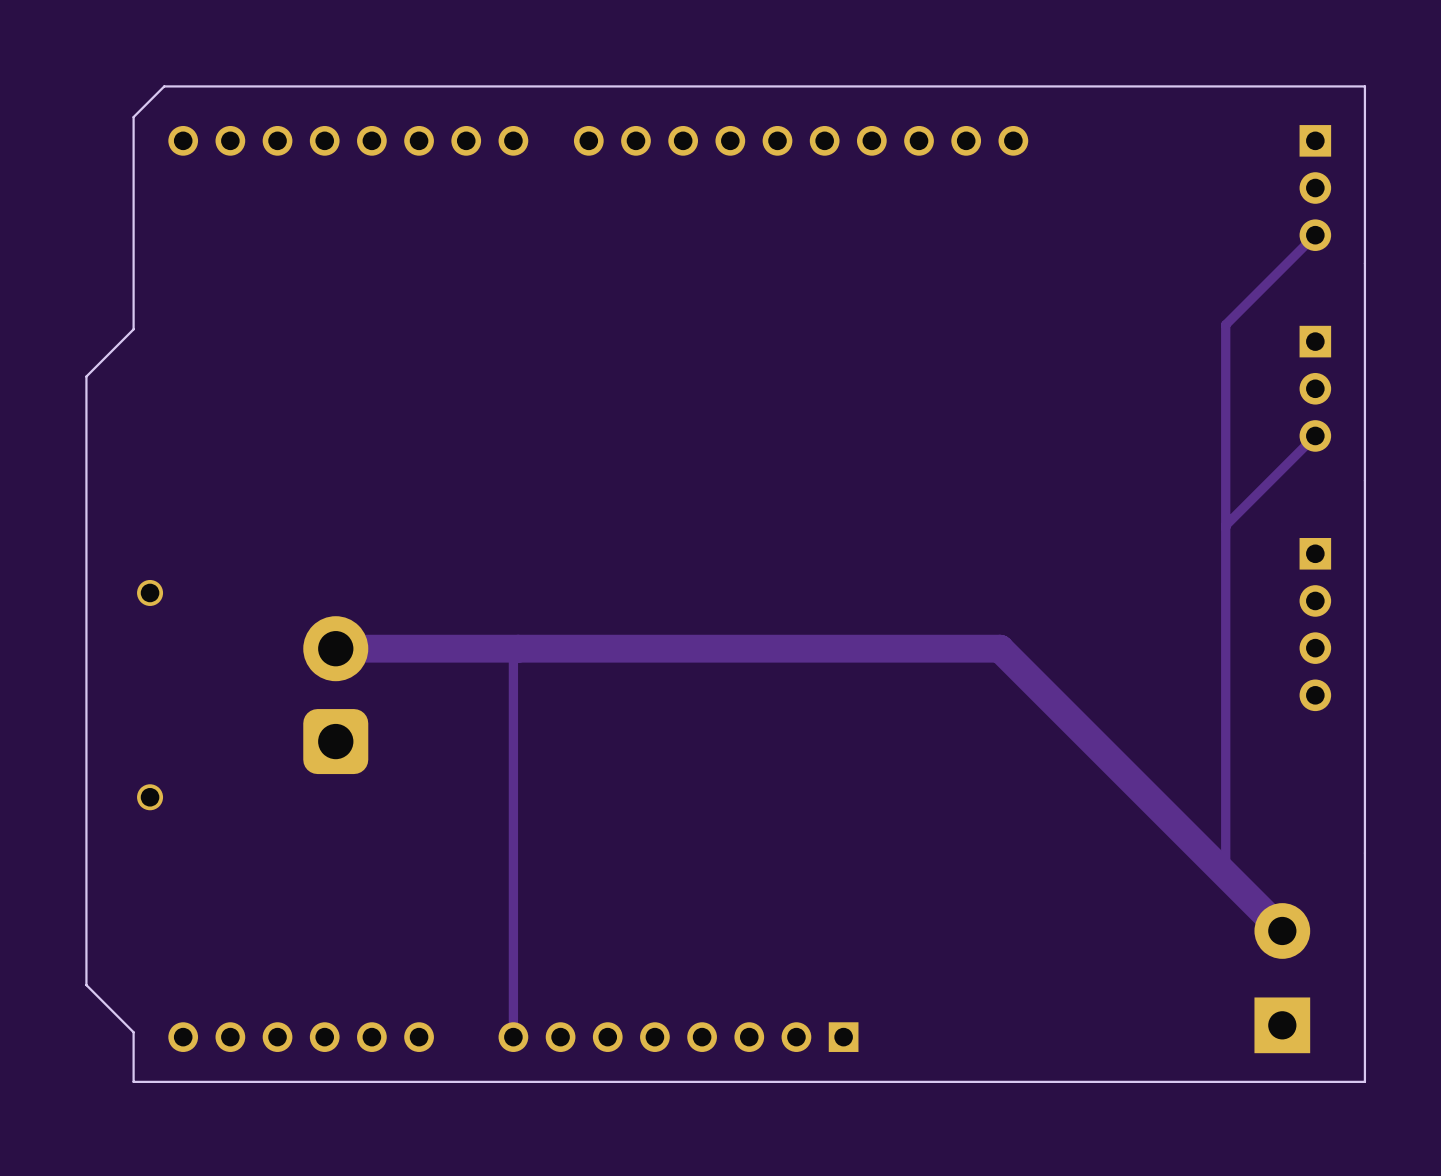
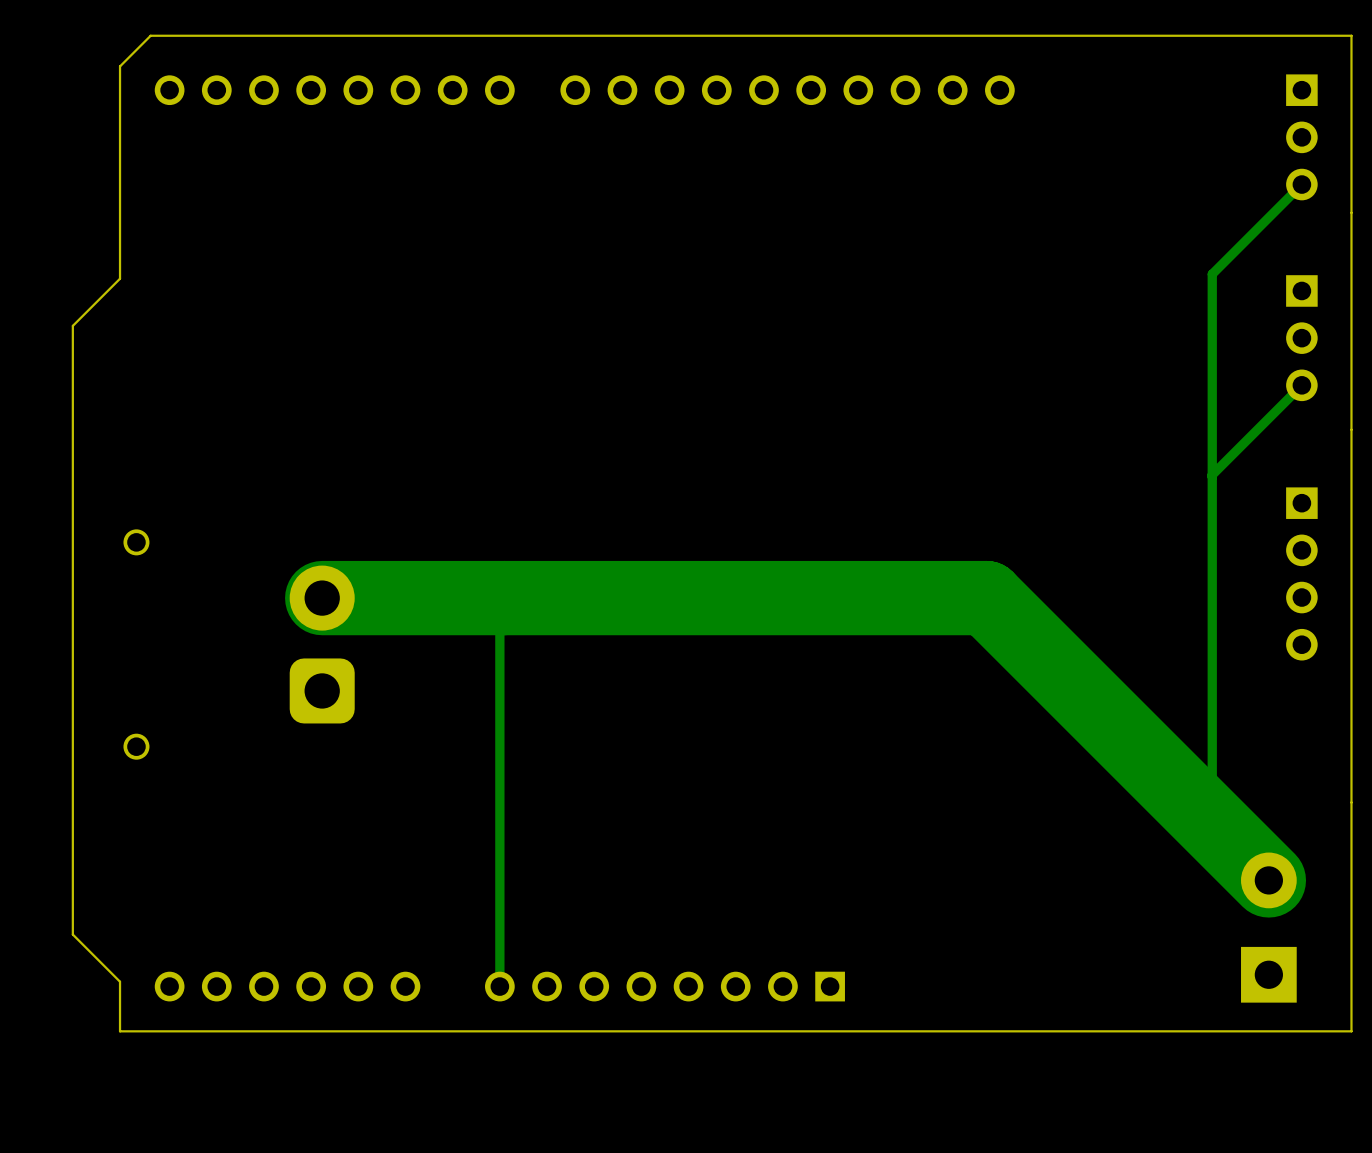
track width: thin (335, 648) (1000, 648) (1282, 930) -> thick (322, 598) (986, 598) (1268, 880)

